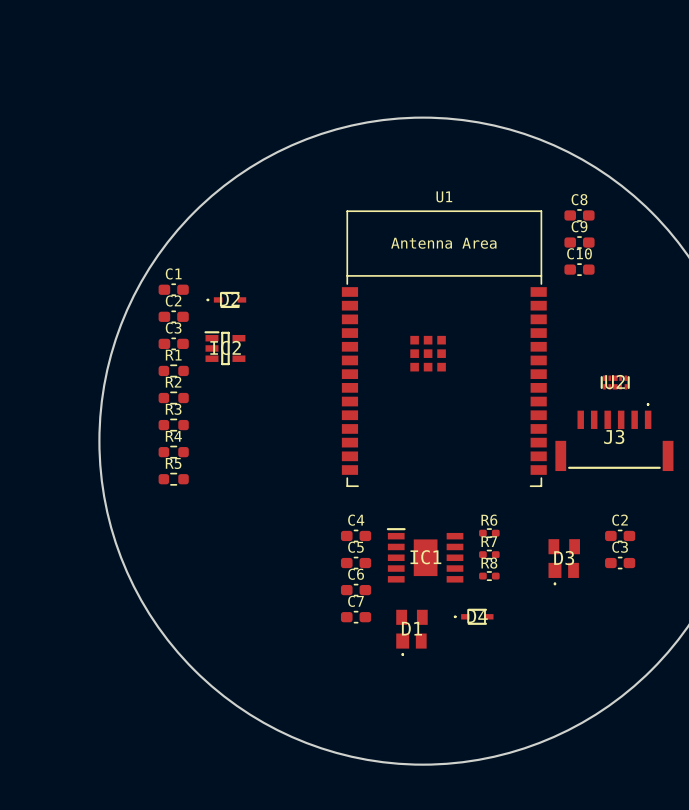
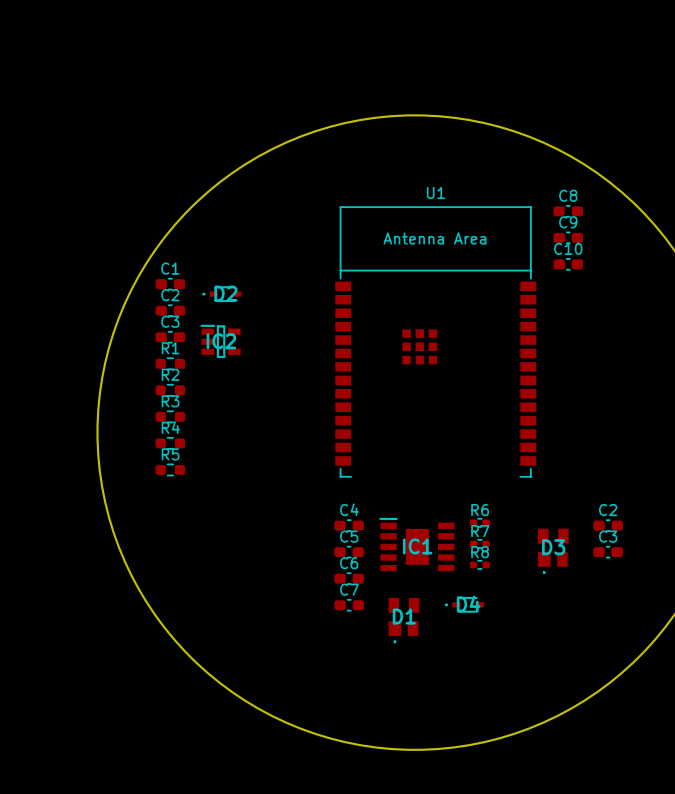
U2: (615, 382) -> none
J3: (614, 437) -> none

